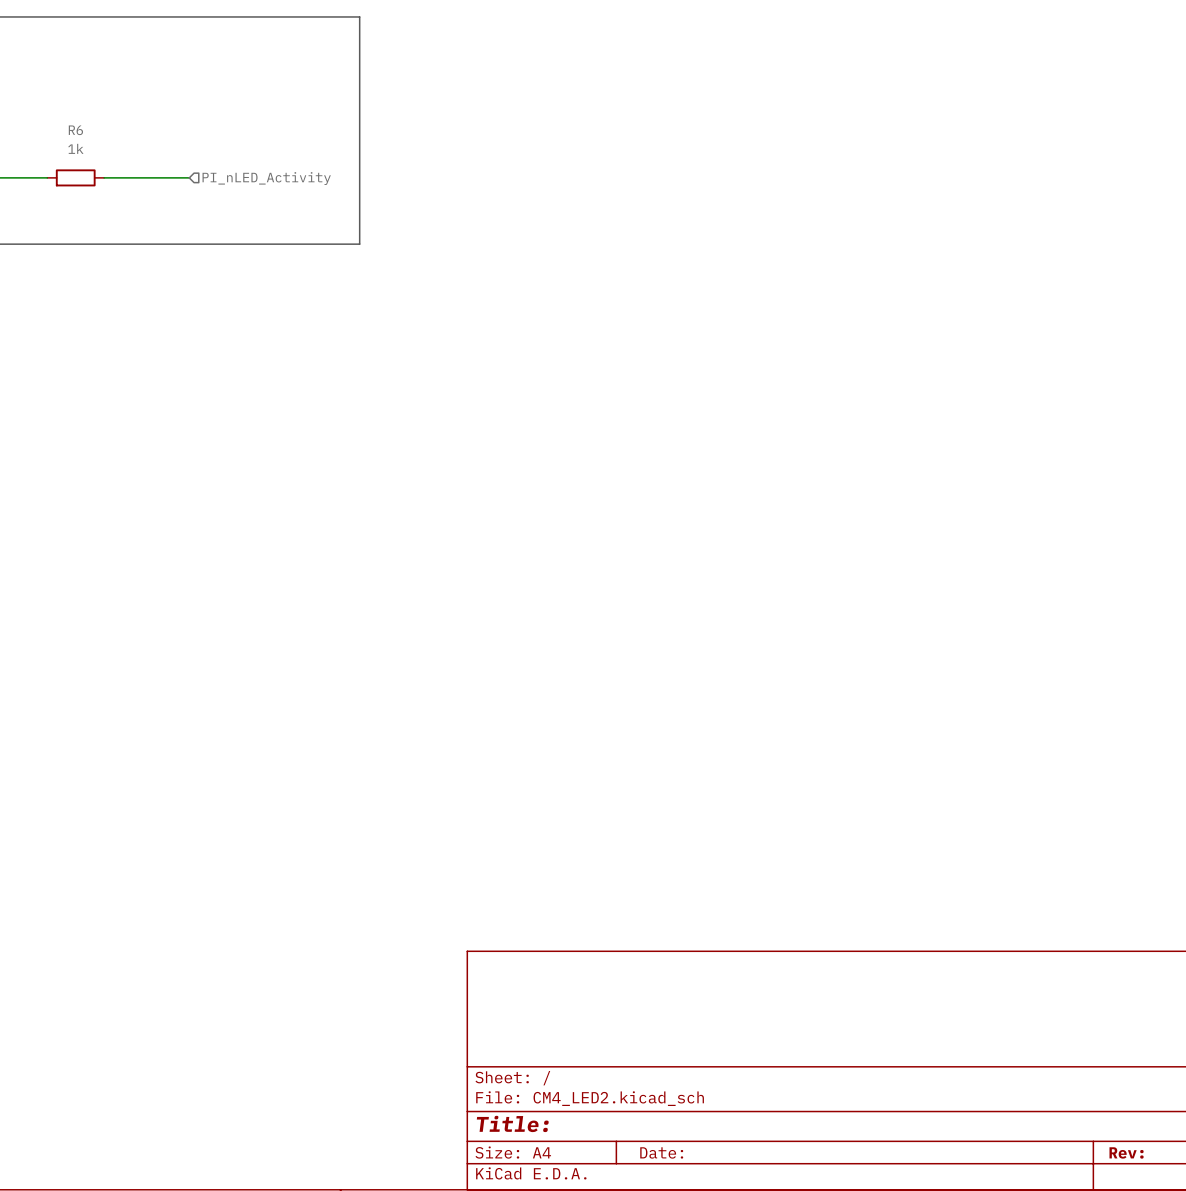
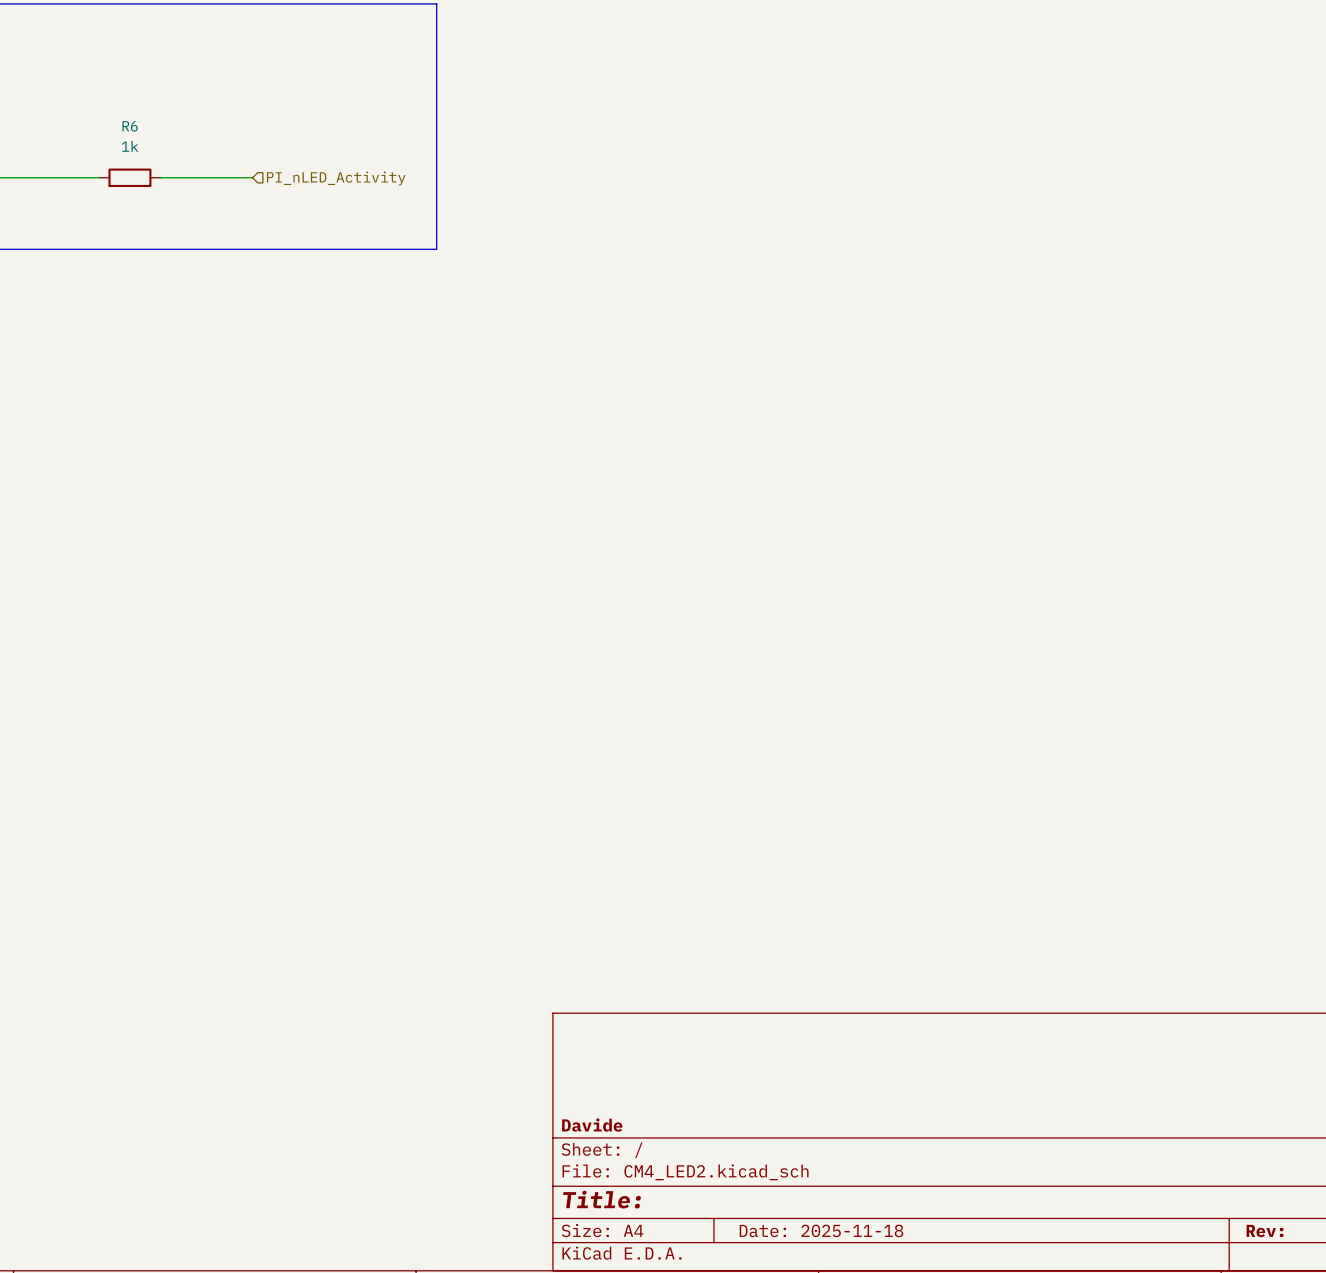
title block: none -> Davide (592, 1125)
title block: Date: (661, 1152) -> Date: 2025-11-18 (821, 1230)

